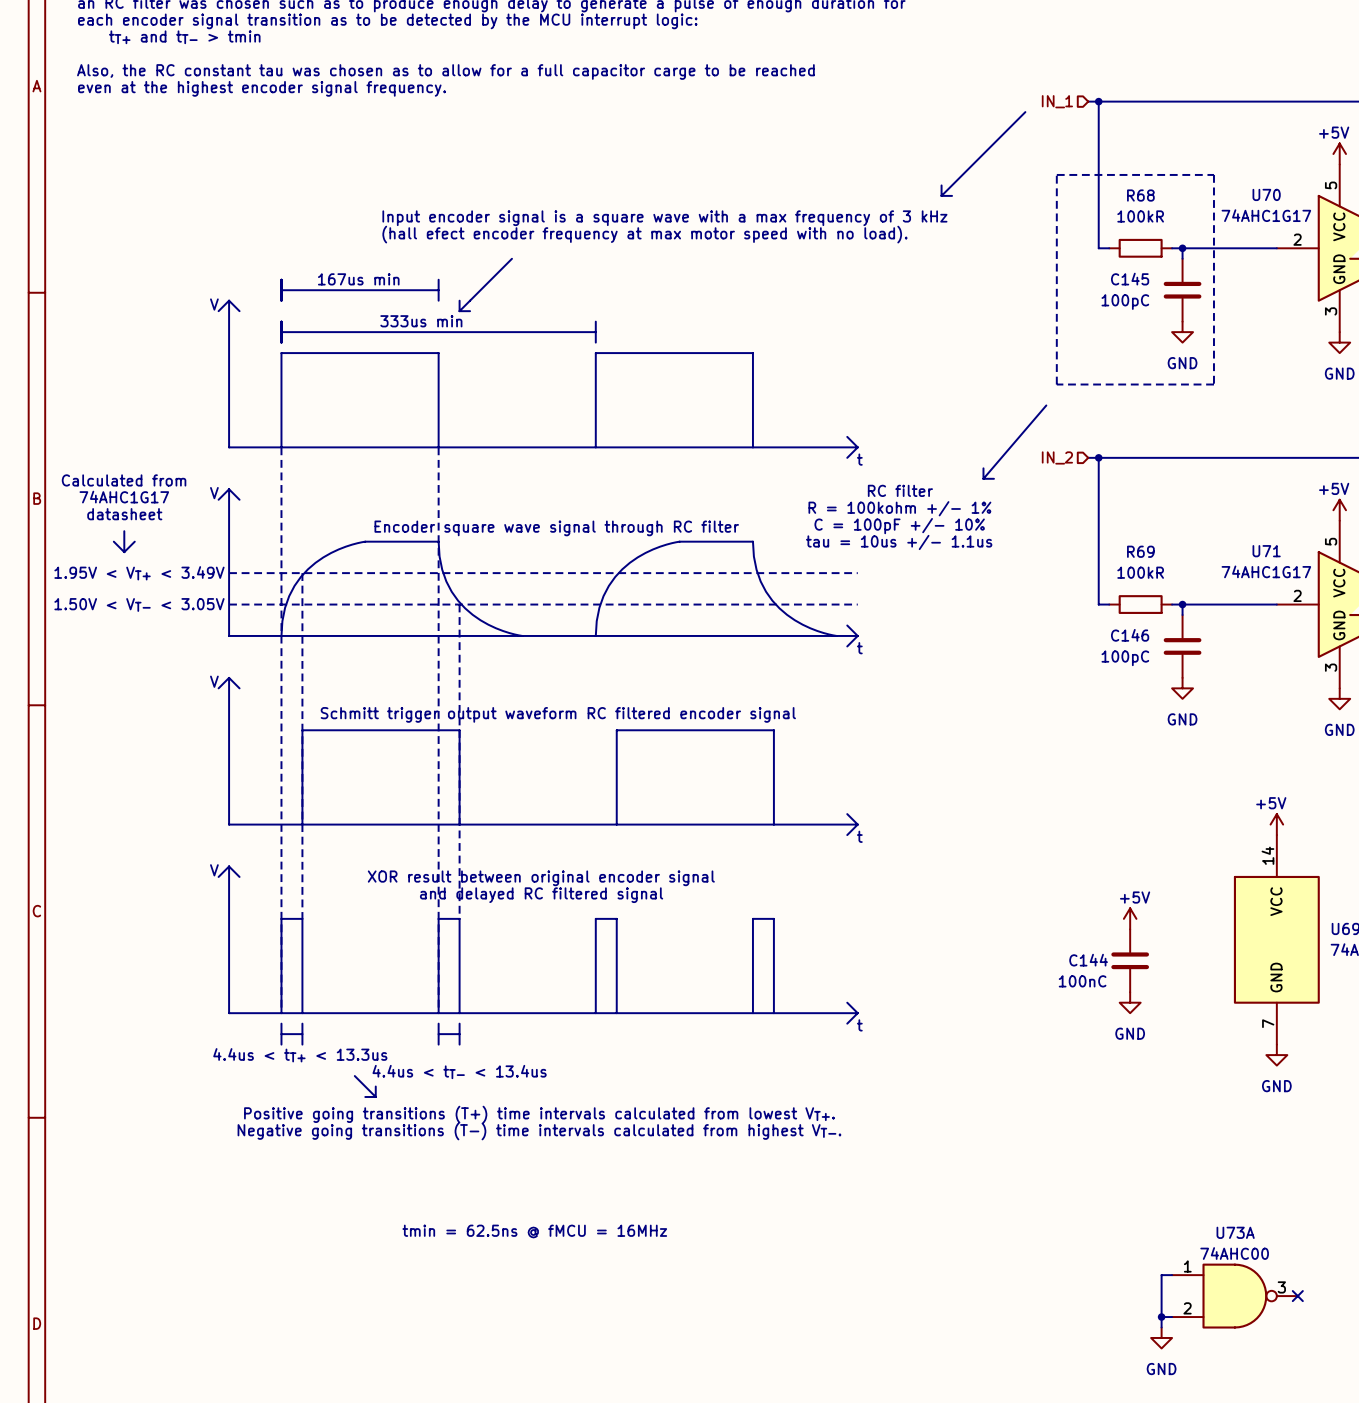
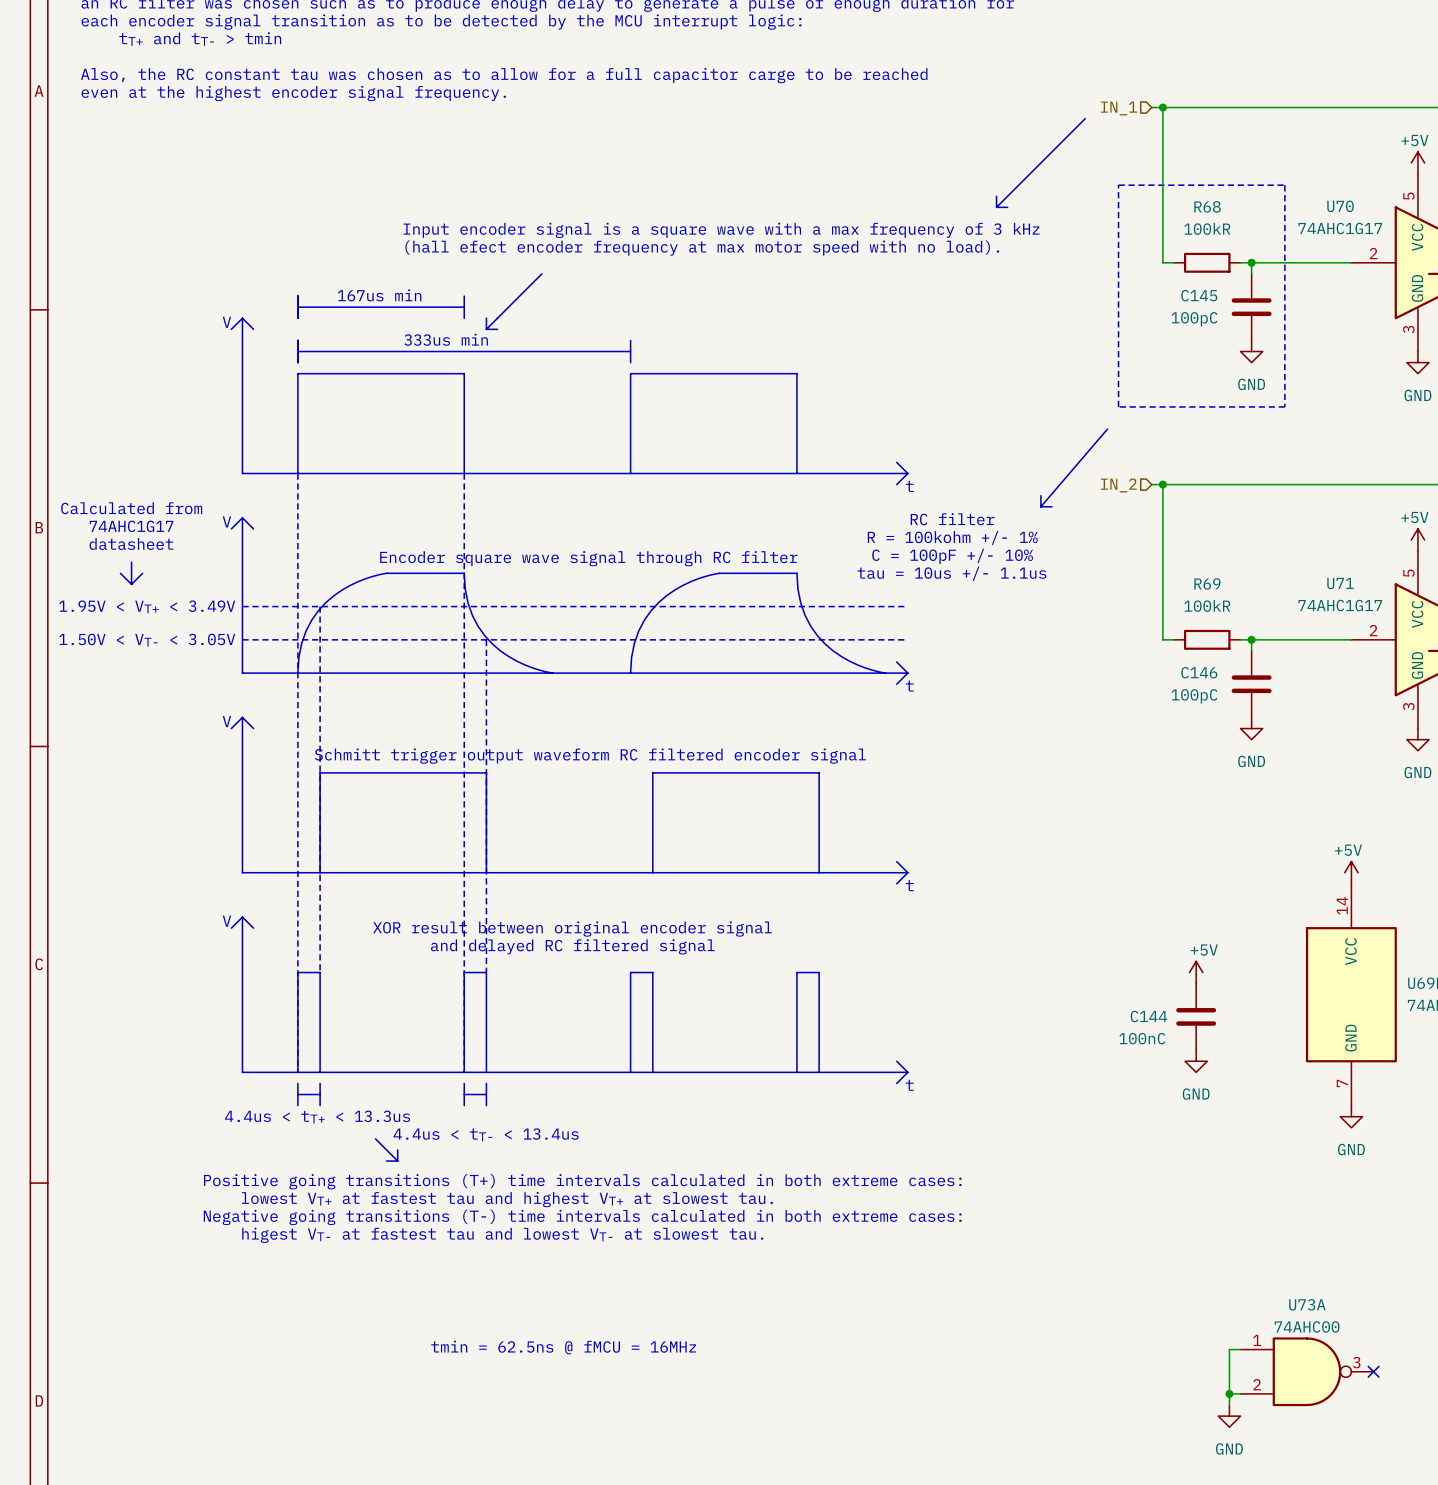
text: Positive going transitions (T+) time intervals calculated from lowest VT+. (539, 1114) -> none
text: none -> Positive going transitions (T+) time intervals calculated in both extreme cases: (582, 1181)
text: Negative going transitions (T-) time intervals calculated from highest VT-. (539, 1131) -> none
text: none -> lowest VT+ at fastest tau and highest VT+ at slowest tau. (507, 1199)
text: none -> Negative going transitions (T-) time intervals calculated in both extreme cases: (582, 1217)
text: none -> higest VT- at fastest tau and lowest VT- at slowest tau. (502, 1235)
text position: tmin = 62.5ns @ fMCU = 16MHz (534, 1231) -> tmin = 62.5ns @ fMCU = 16MHz (563, 1347)

